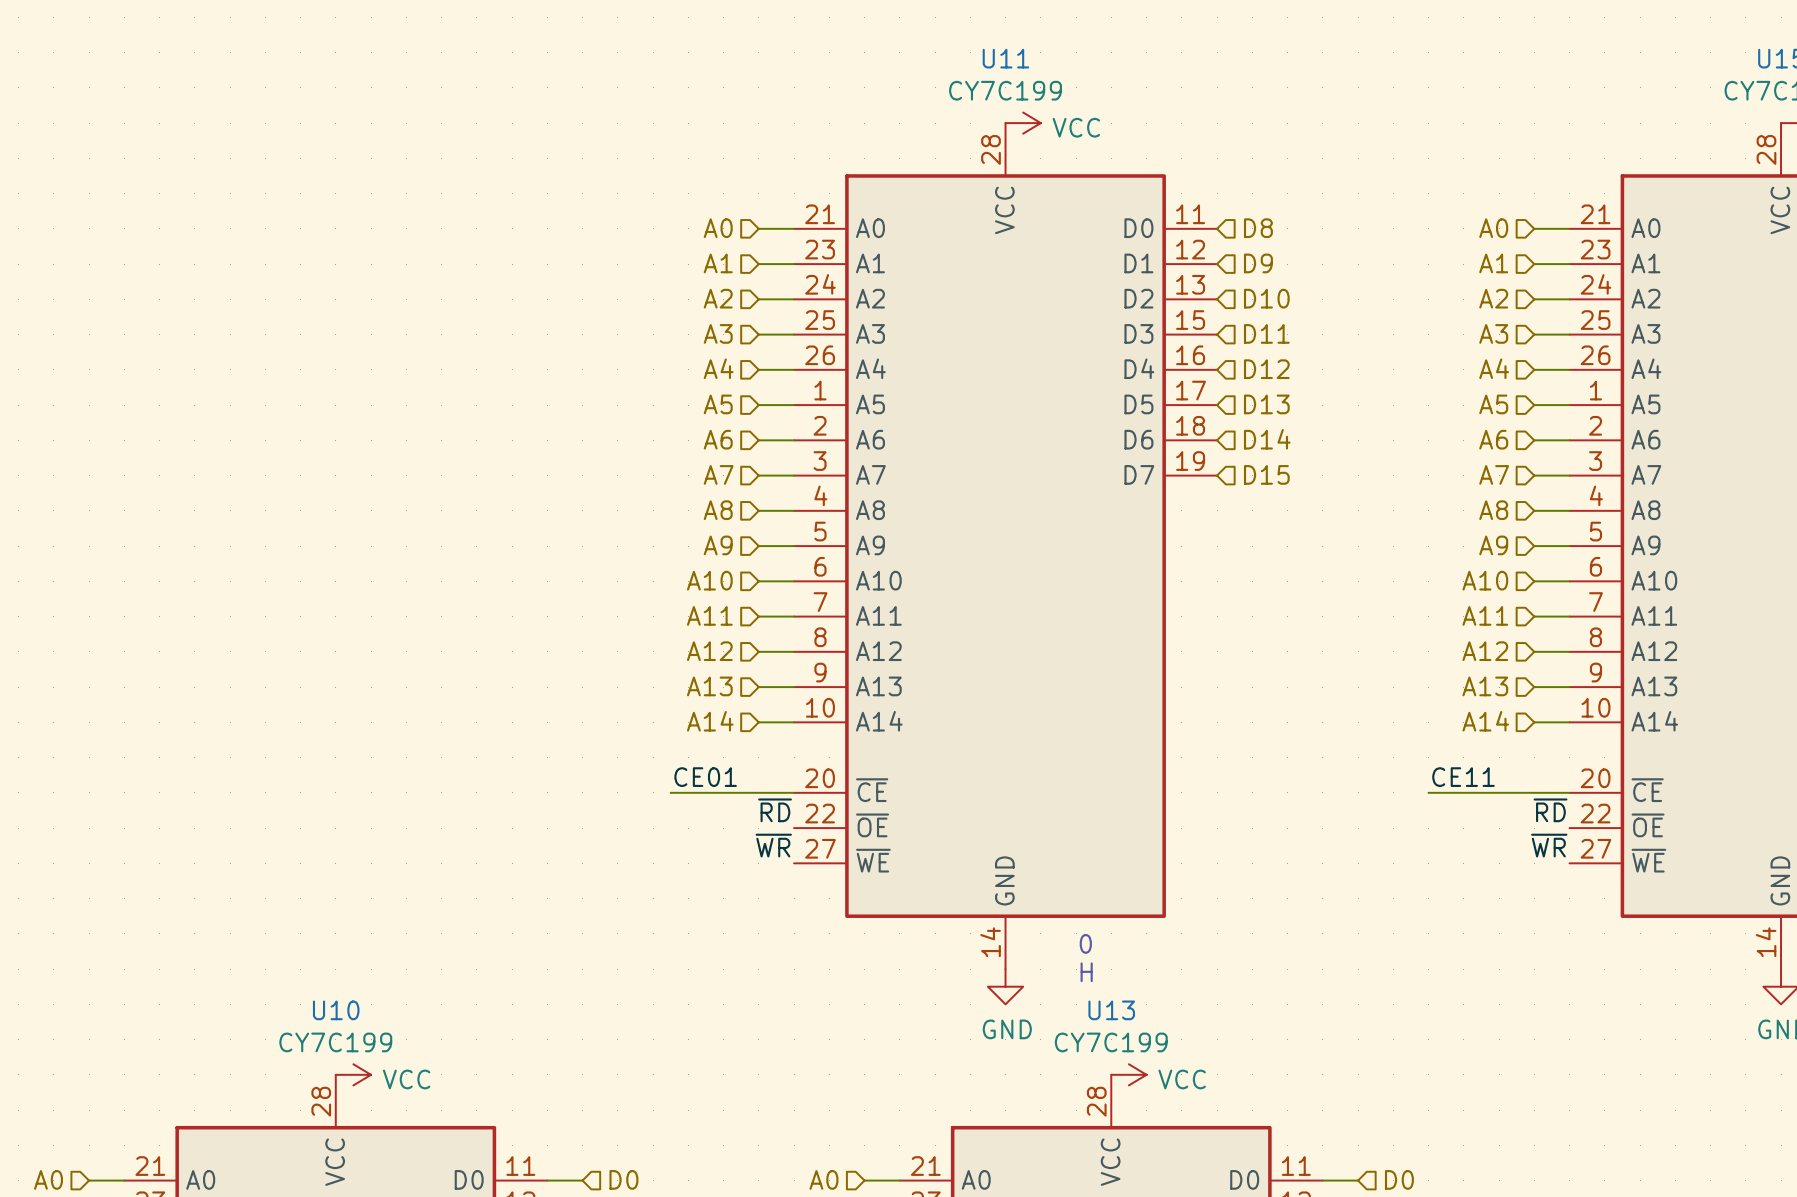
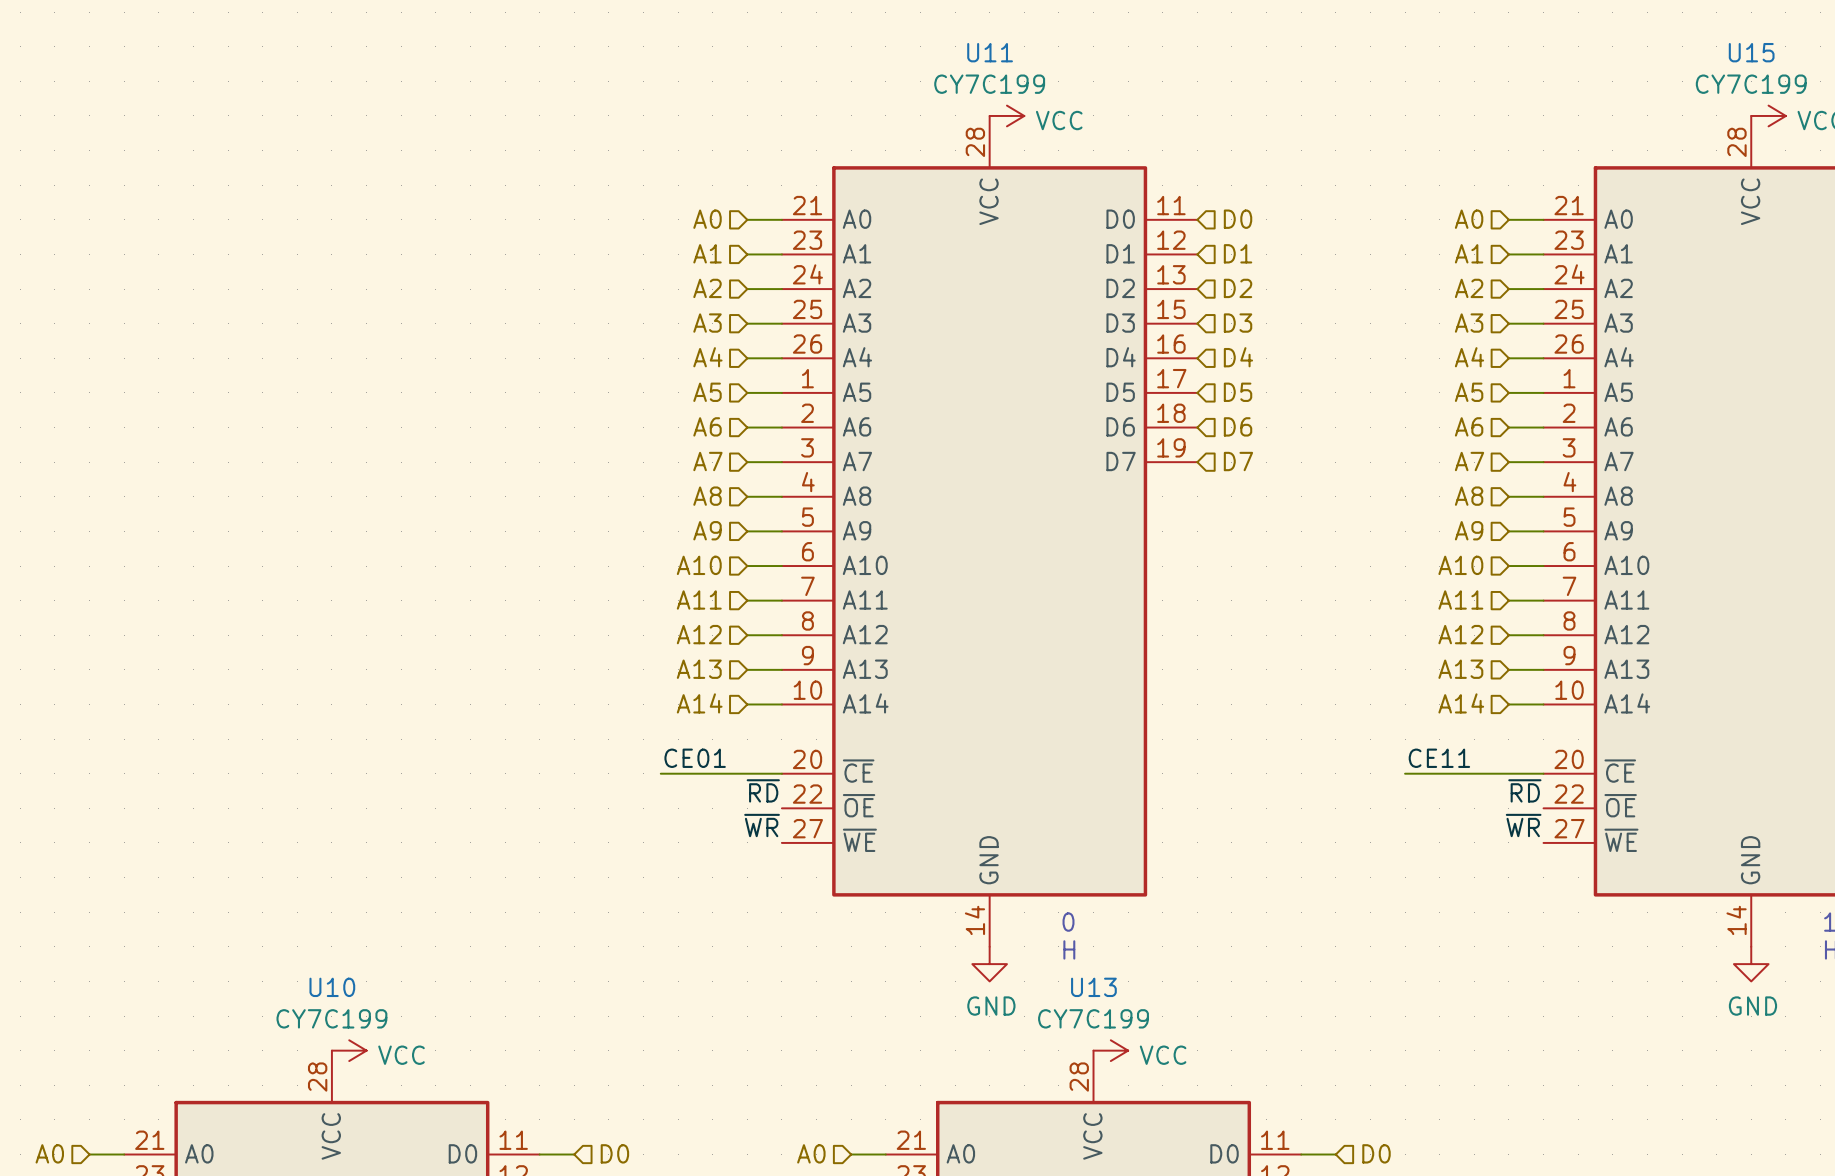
hierarchical label: D8 (1258, 228) -> D0 (1238, 219)
hierarchical label: D9 (1258, 263) -> D1 (1238, 253)
hierarchical label: D10 (1266, 298) -> D2 (1238, 288)
hierarchical label: D11 (1266, 333) -> D3 (1238, 323)
hierarchical label: D12 (1266, 369) -> D4 (1238, 357)
hierarchical label: D13 (1266, 404) -> D5 (1238, 392)
hierarchical label: D14 (1267, 439) -> D6 (1238, 426)
hierarchical label: D15 (1266, 474) -> D7 (1238, 461)

